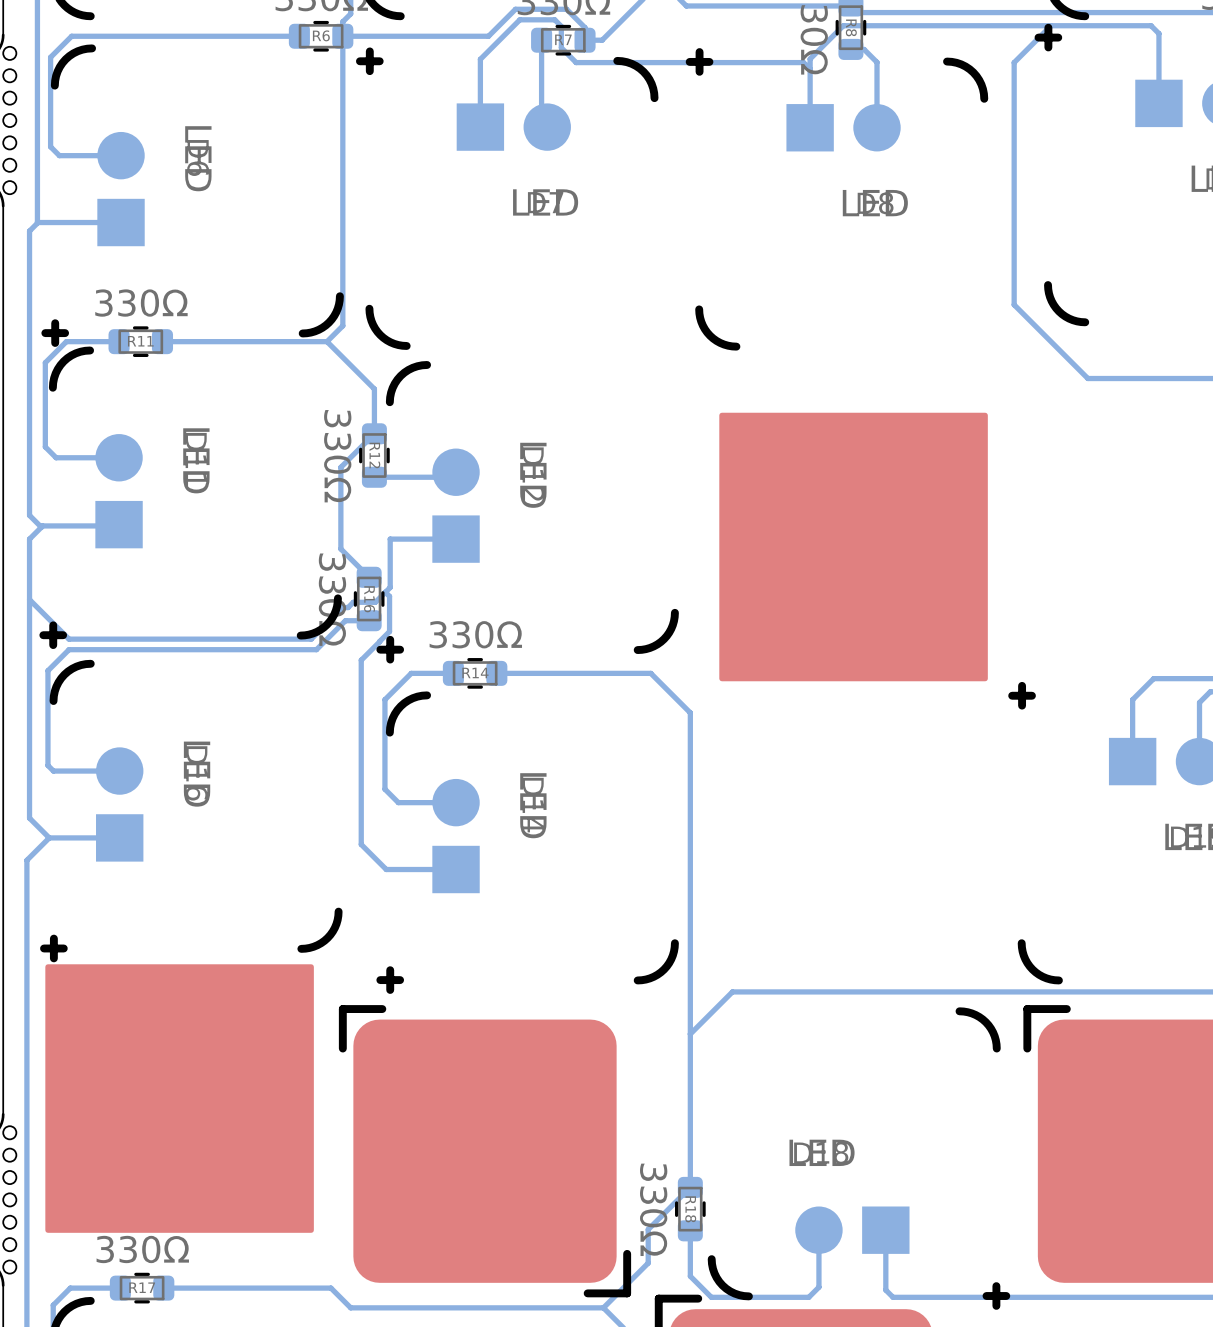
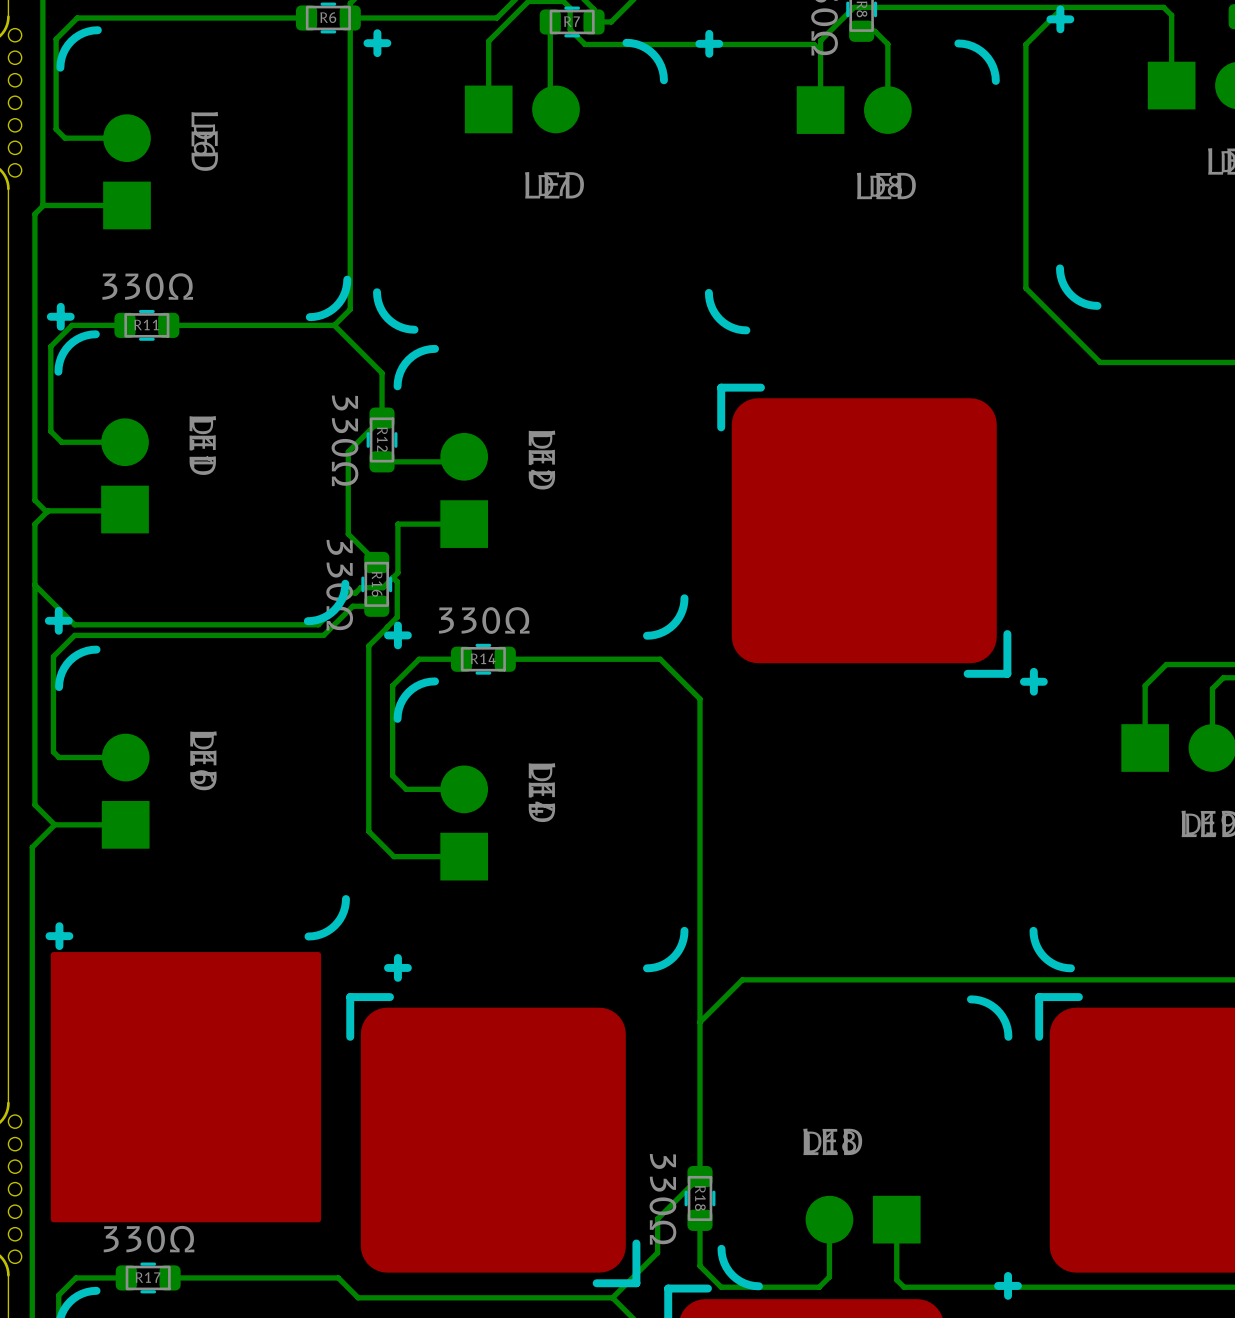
drawing: [719, 412, 988, 682] -> none
part: none -> (864, 530)

